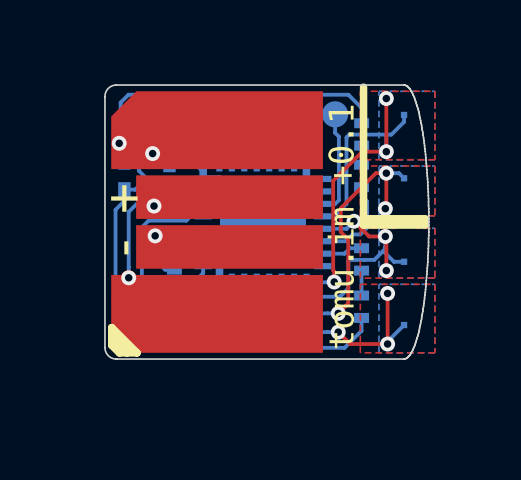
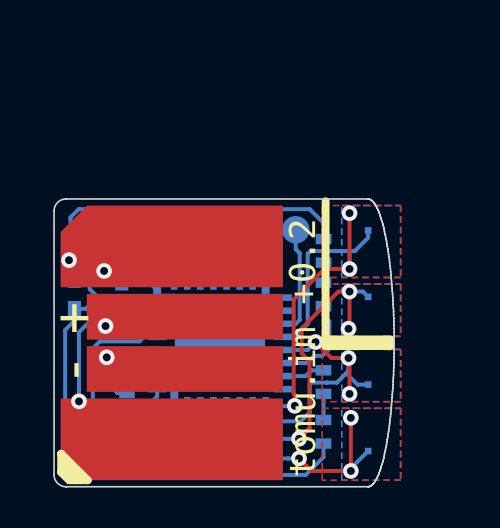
text: tomu.im +0.1 (340, 227) -> tomu.im +0.2 (301, 348)

